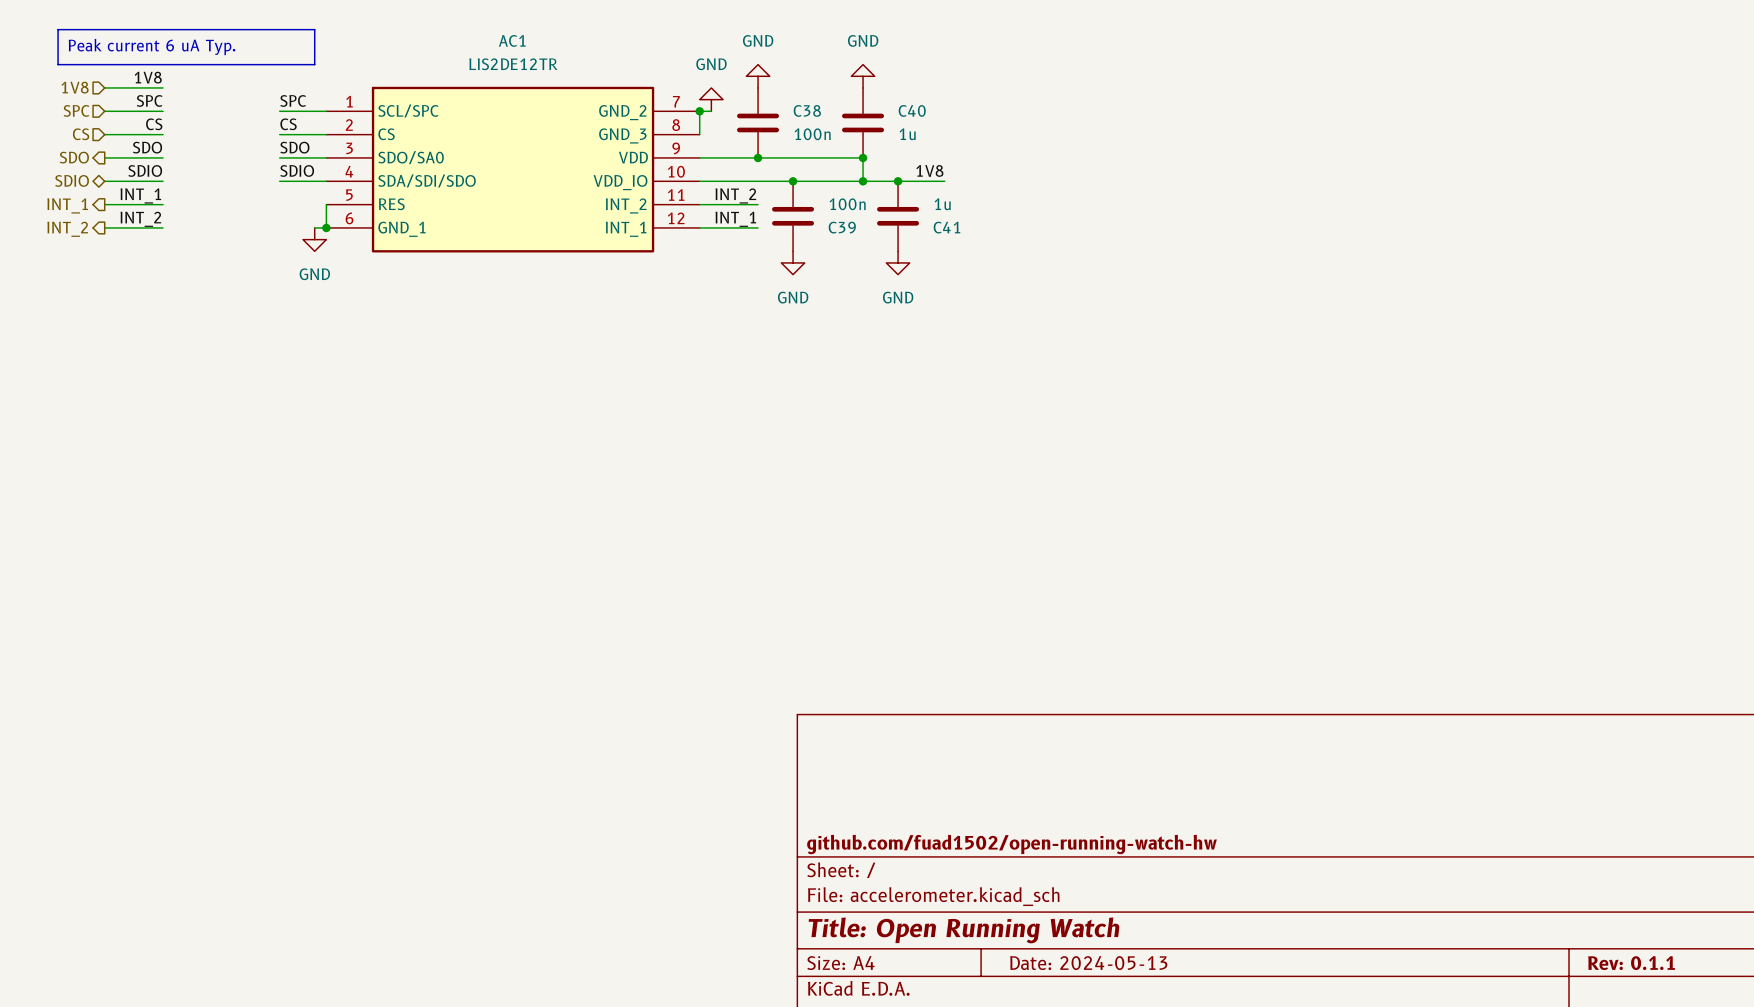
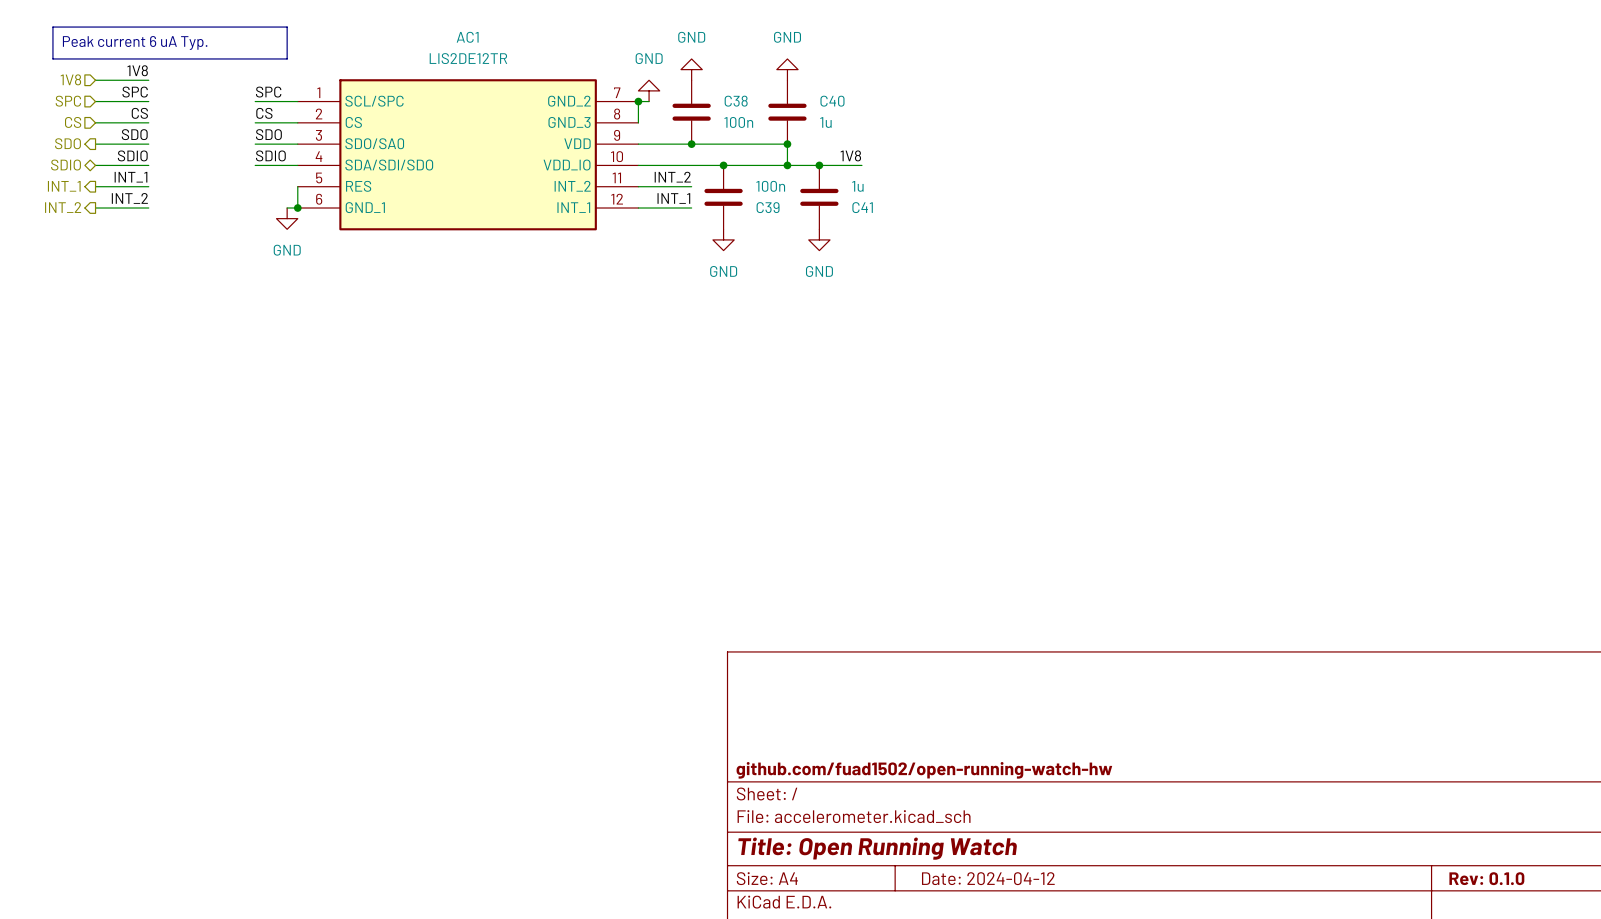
title block: Date: 2024-05-13 (1088, 963) -> Date: 2024-04-12 (988, 878)
title block: Rev: 0.1.1 (1631, 963) -> Rev: 0.1.0 (1486, 878)

